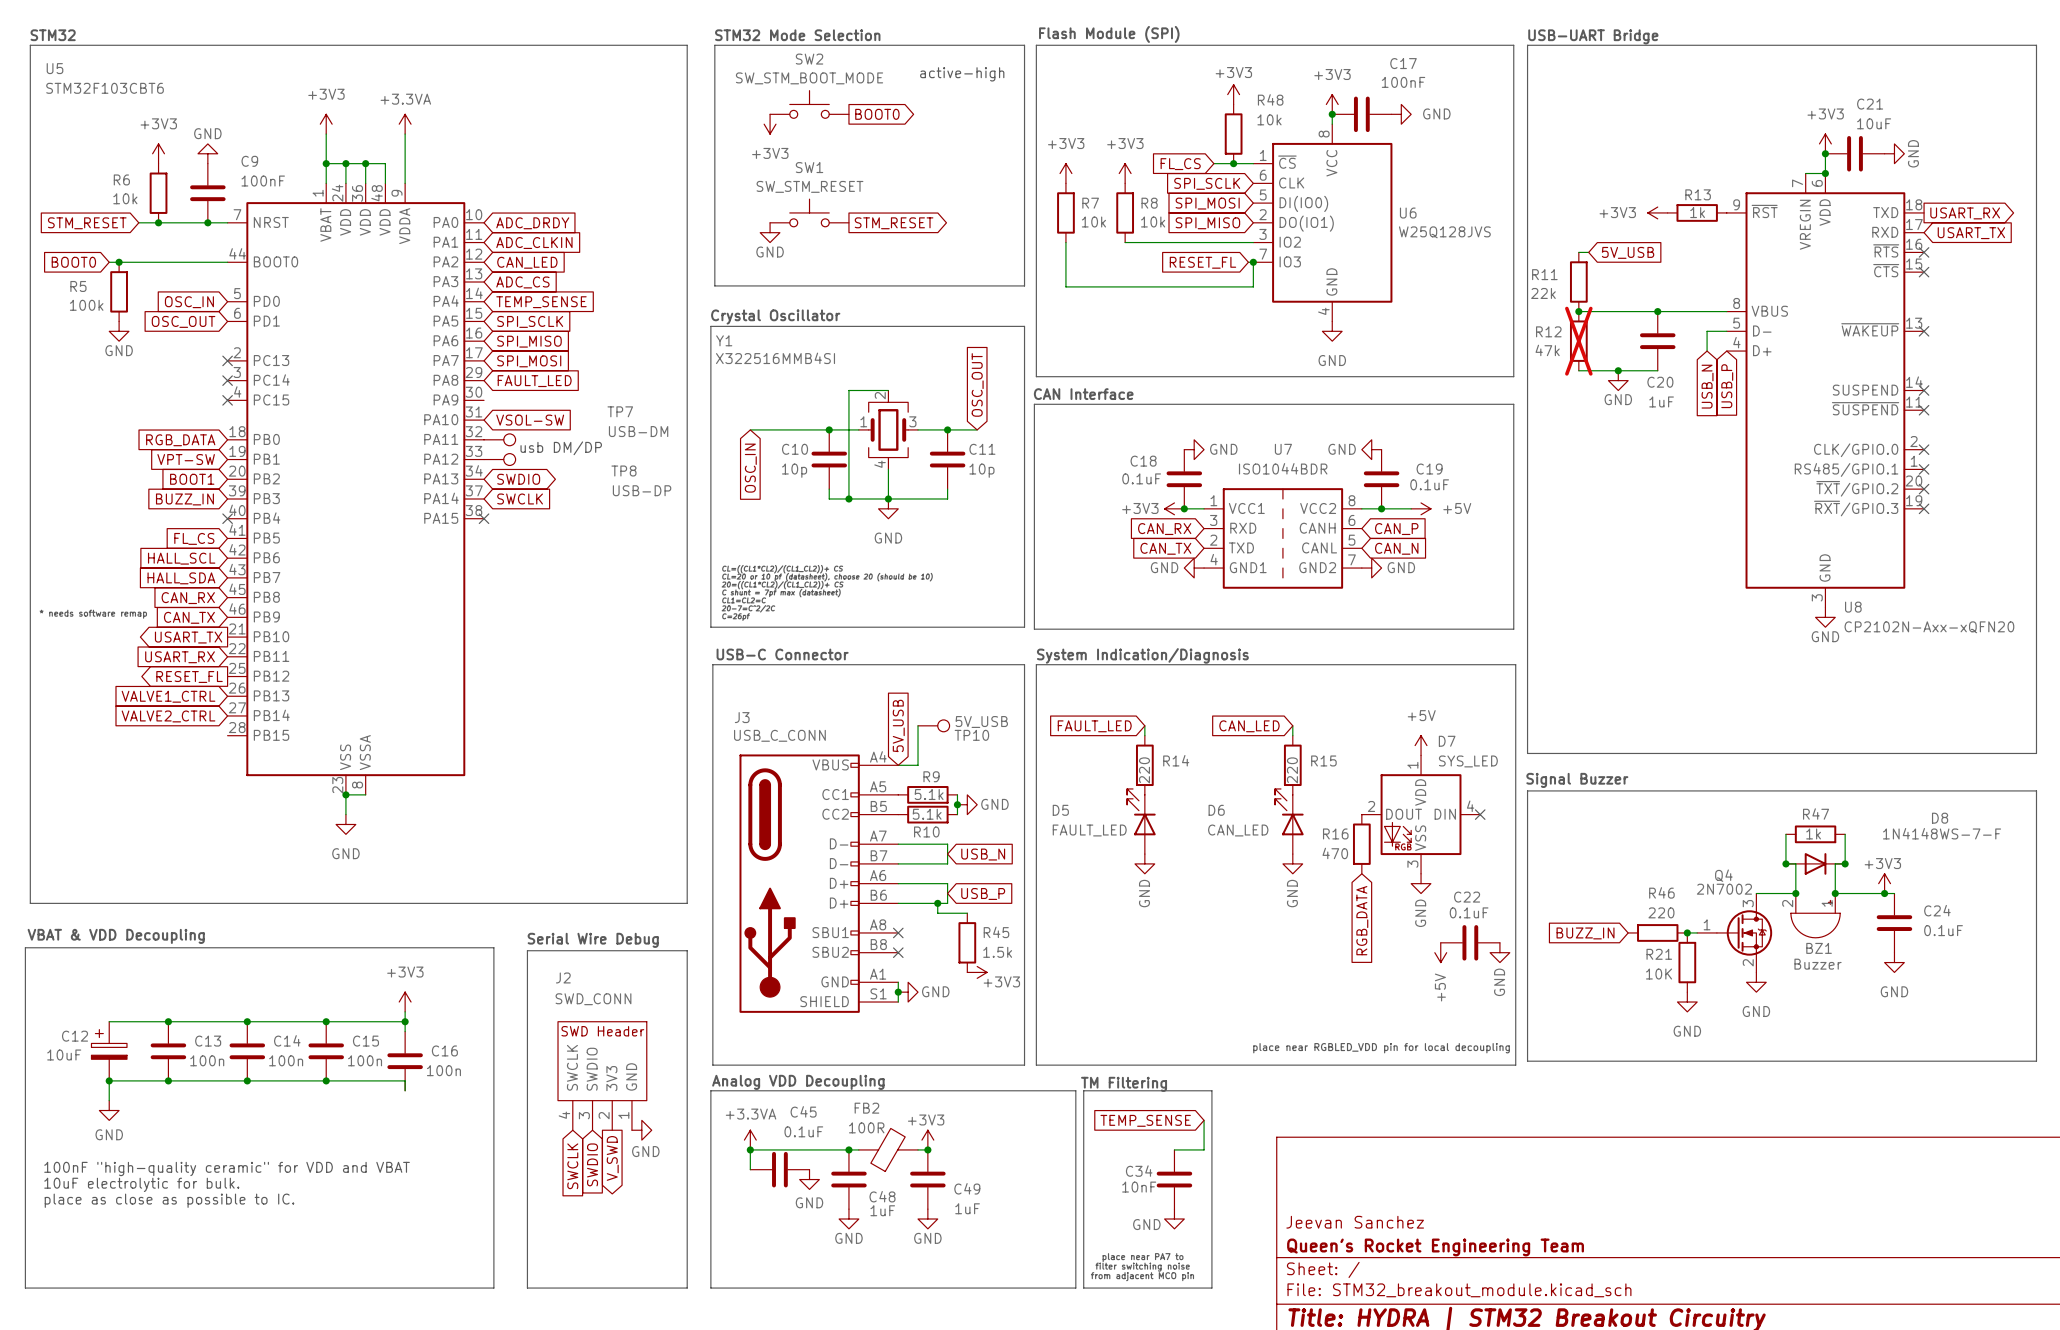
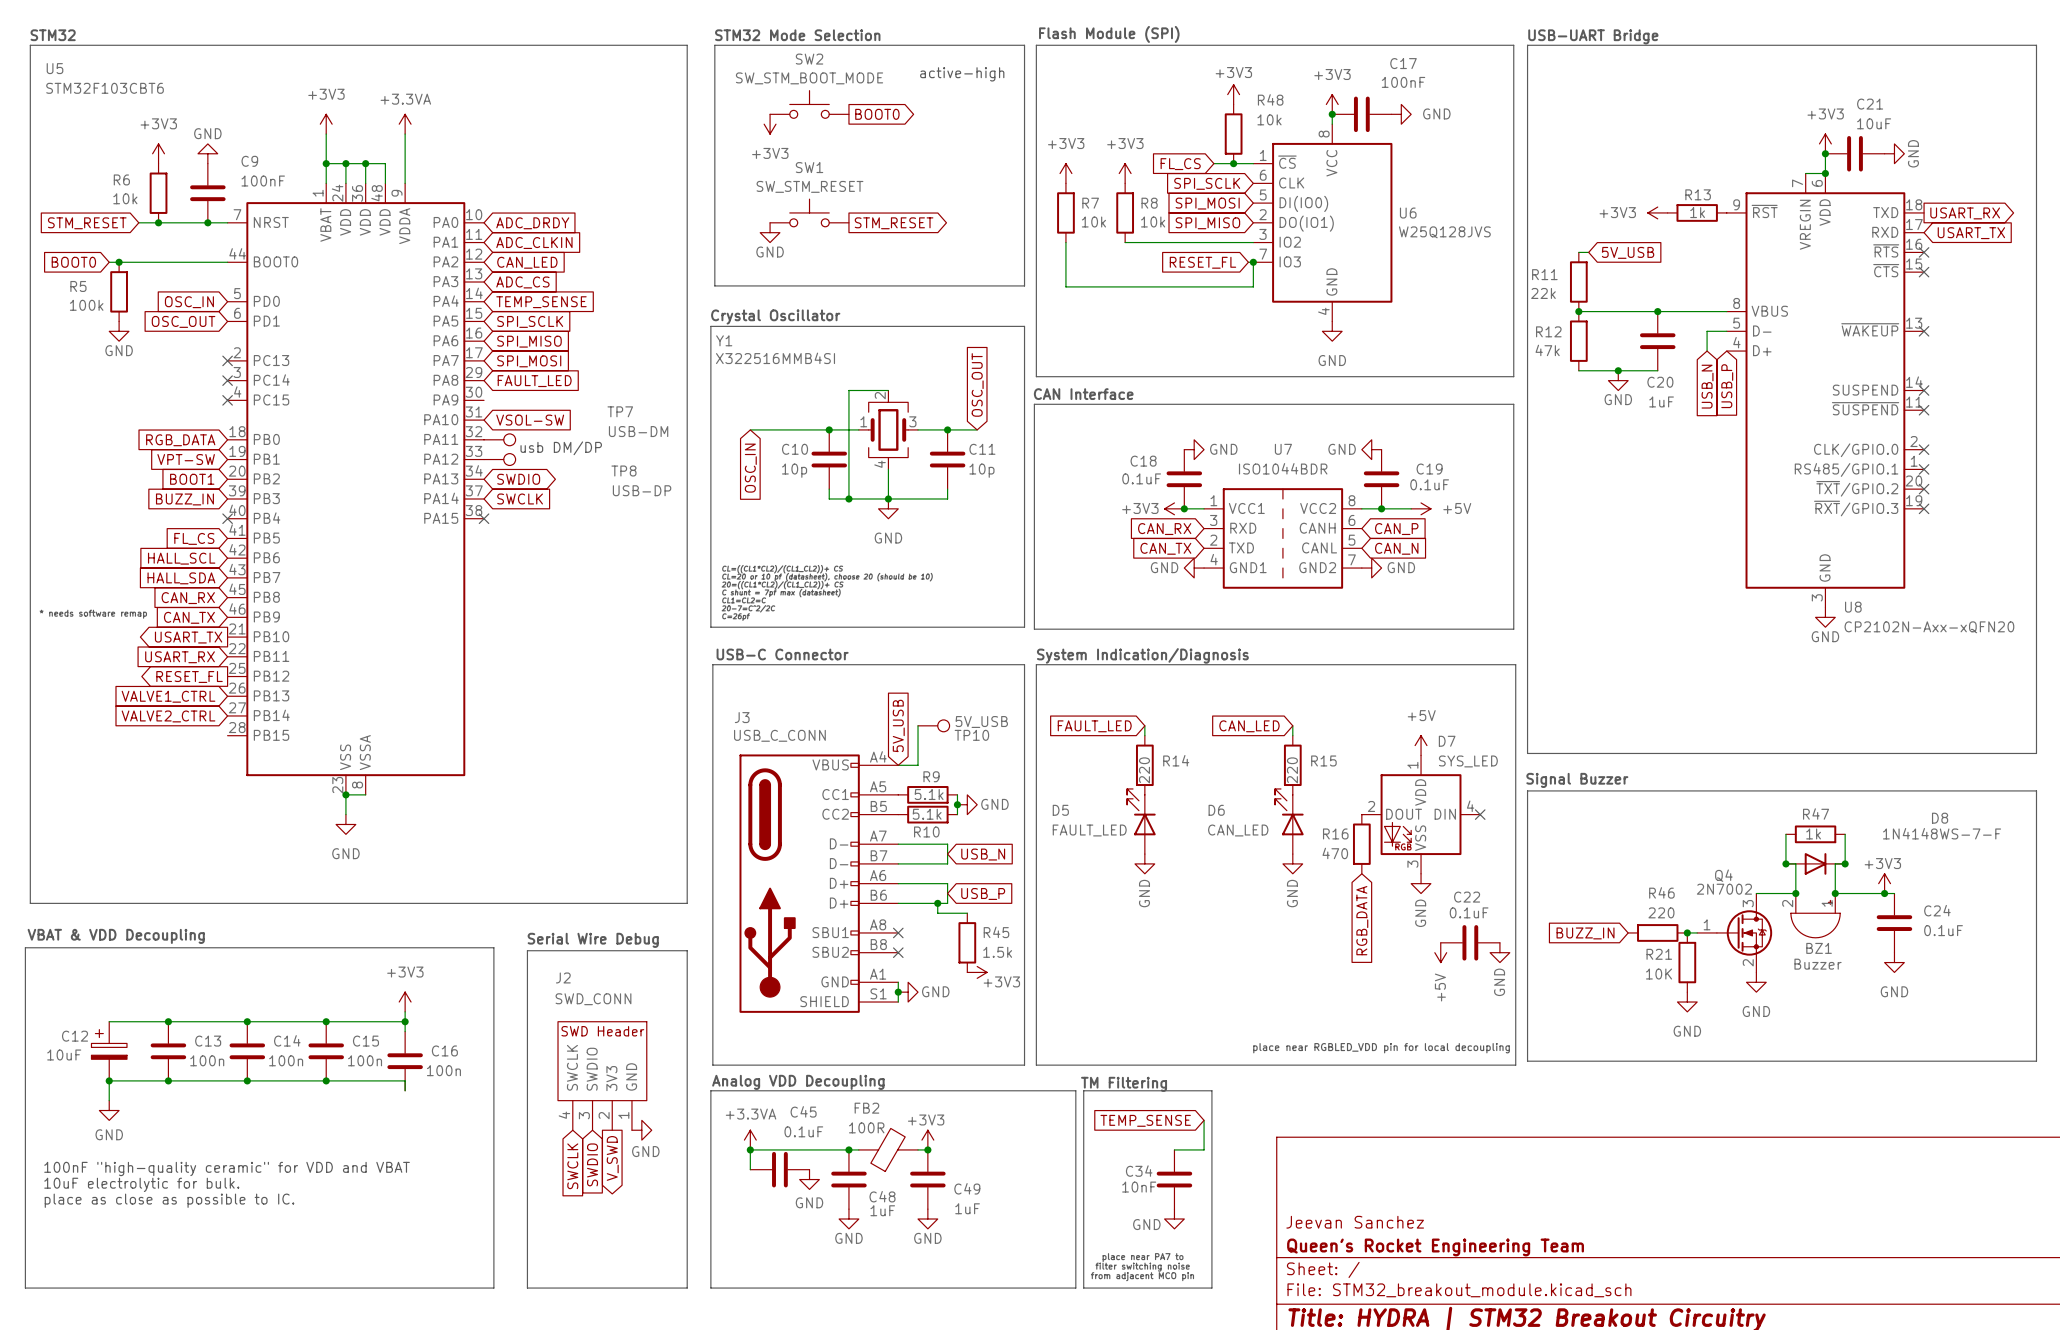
R12 do-not-place cross: (1578, 341) -> none

